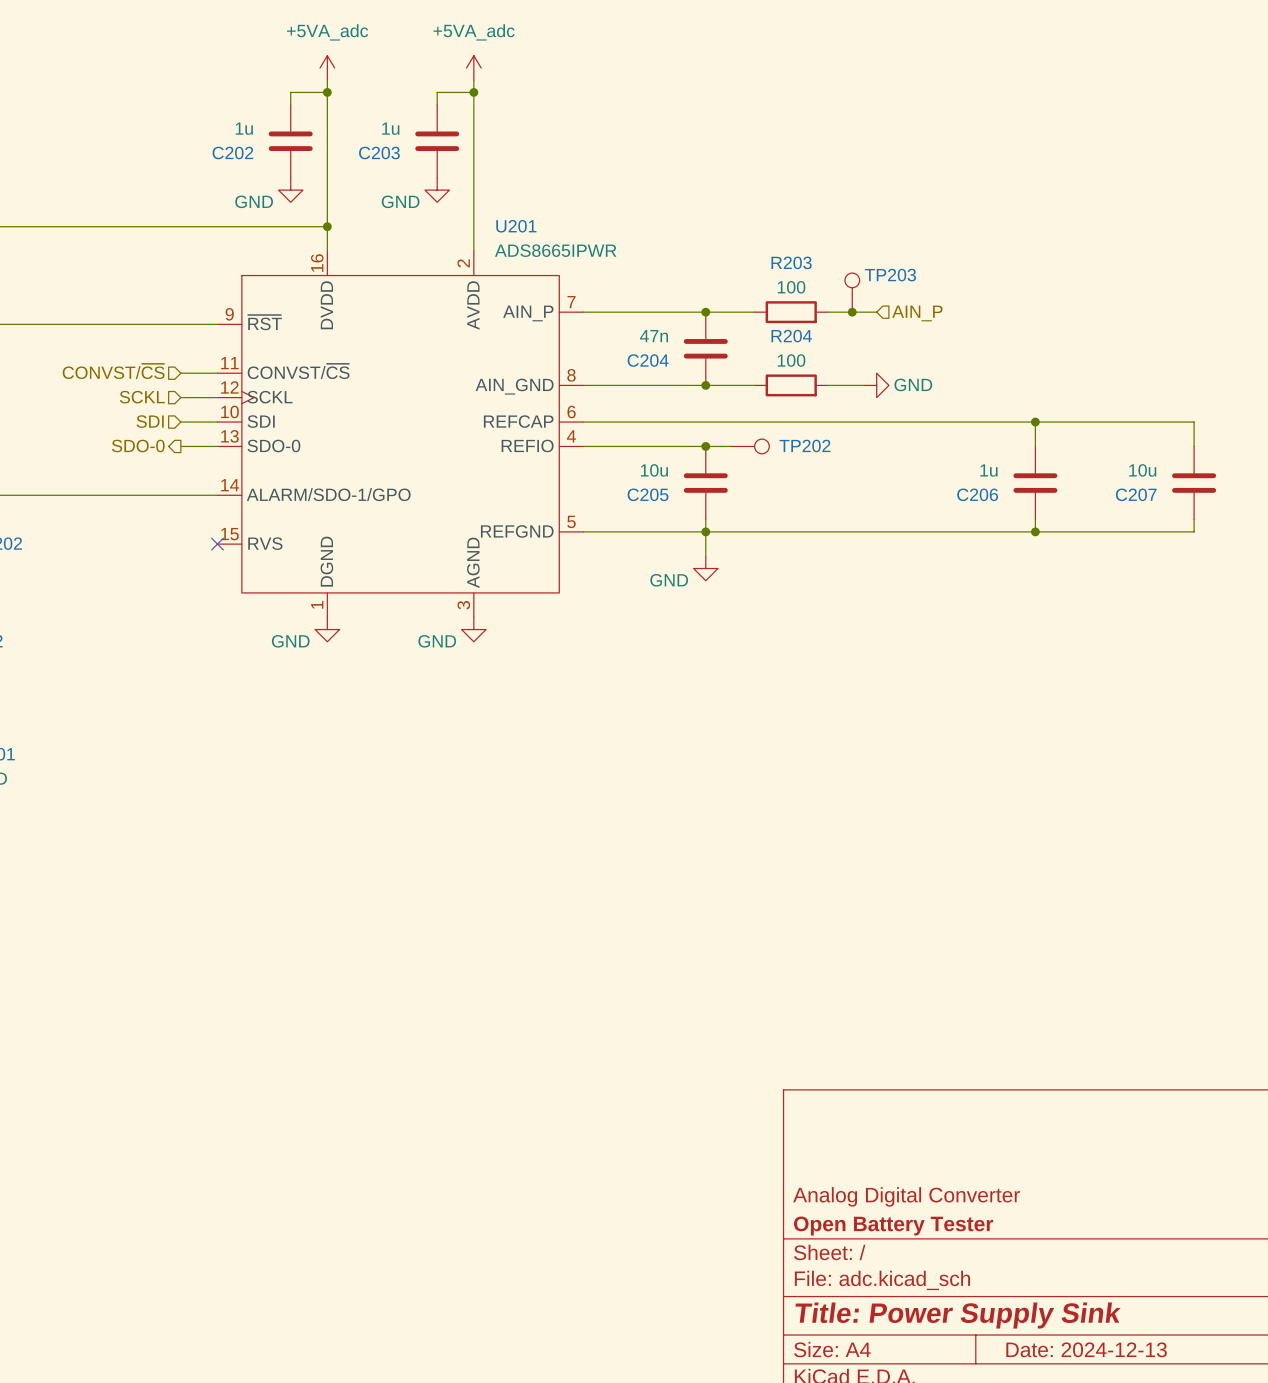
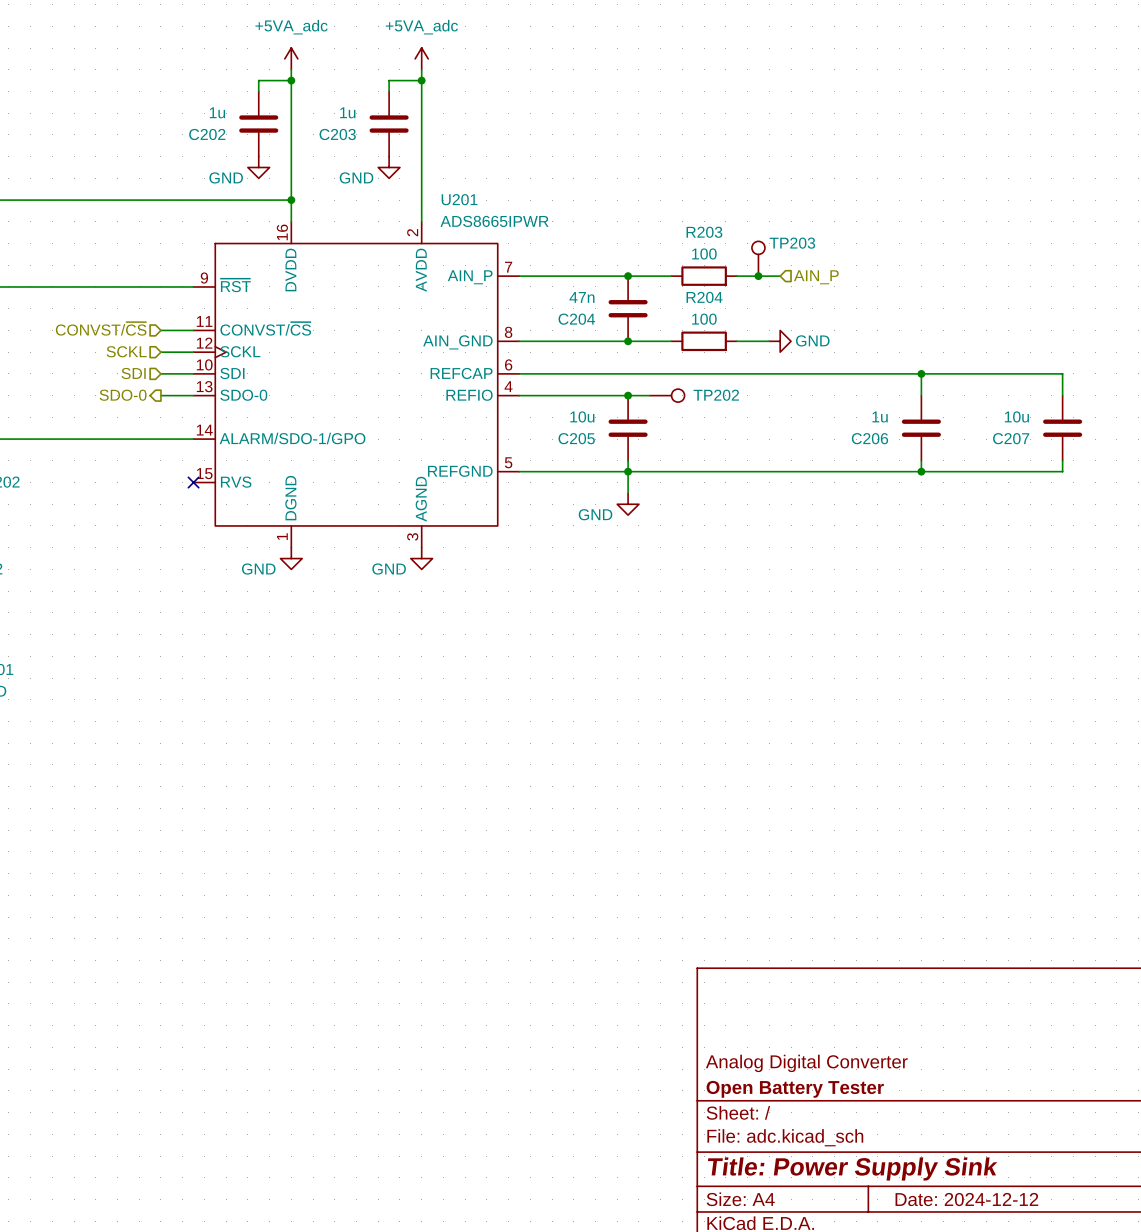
title block: Date: 2024-12-13 (1086, 1349) -> Date: 2024-12-12 (966, 1199)

